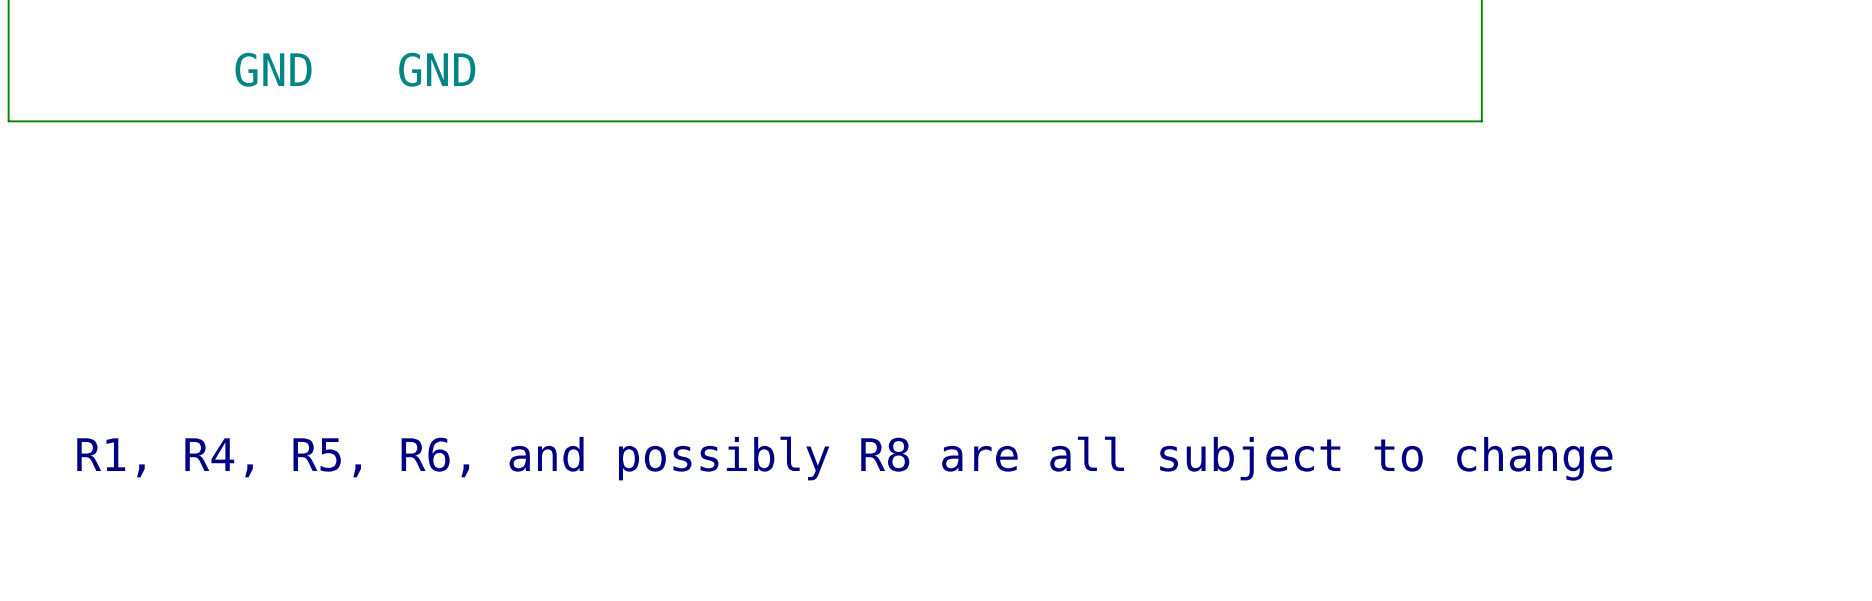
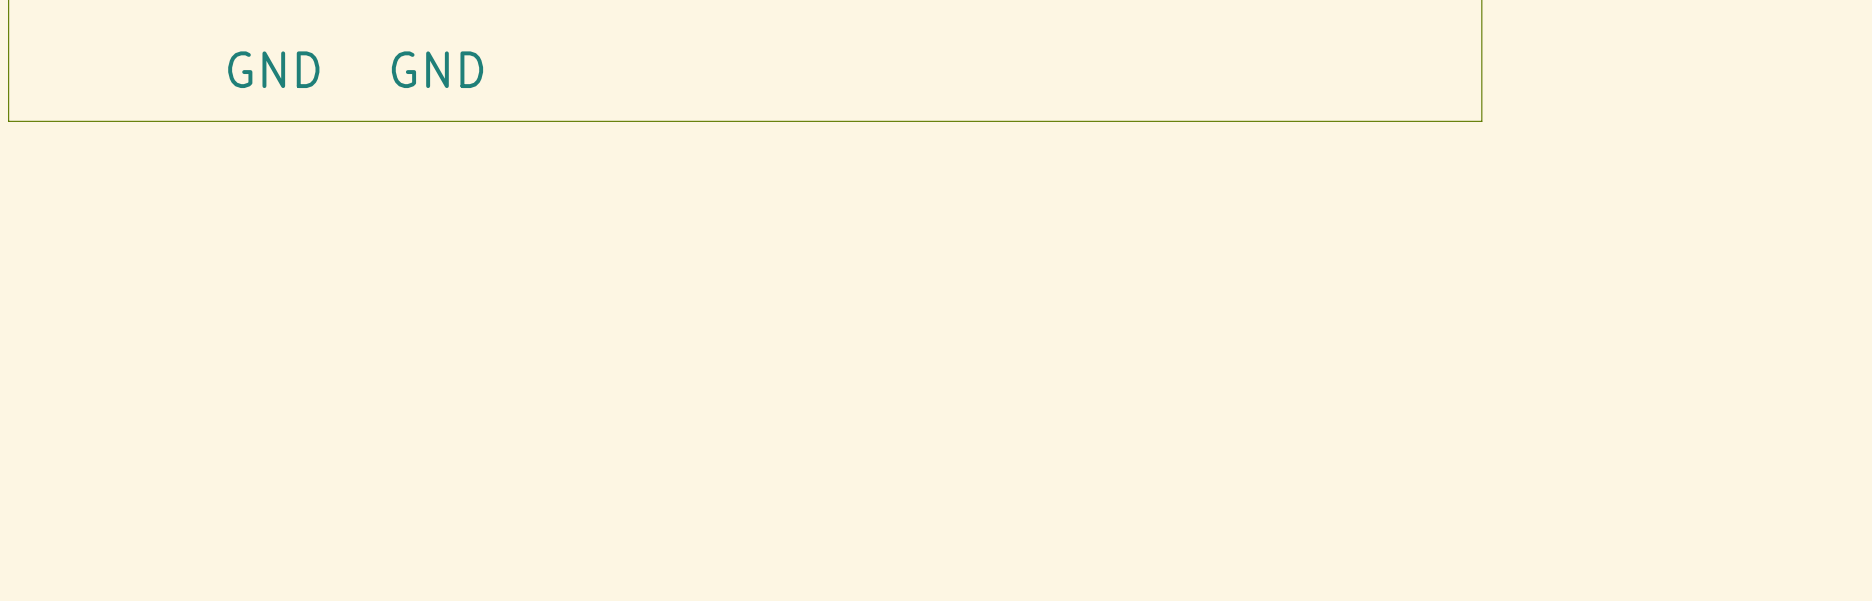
text: R1, R4, R5, R6, and possibly R8 are all subject to change (844, 458) -> none

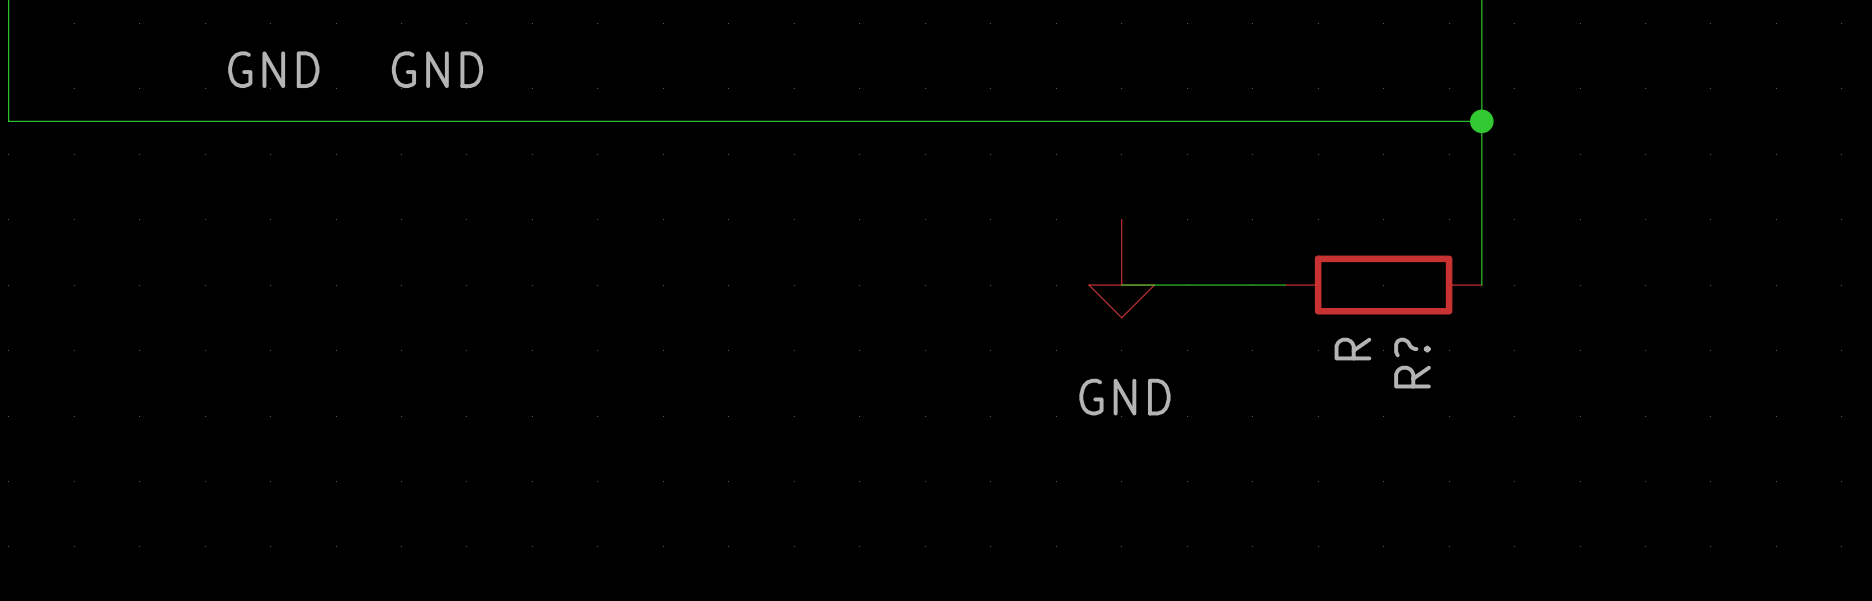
wire: none -> (1481, 121) (1481, 285)
junction: none -> (1481, 121)
power symbol: none -> GND (1121, 268)
wire: none -> (1121, 285) (1285, 285)
R?: none -> R (1383, 285)

